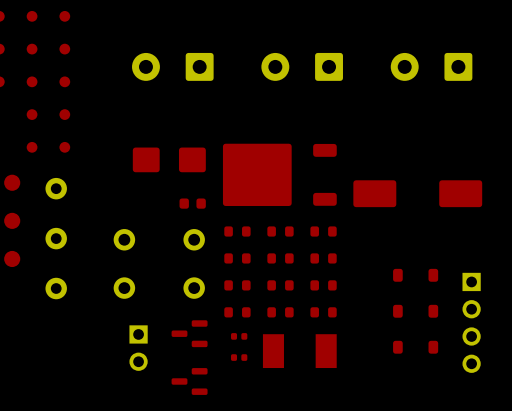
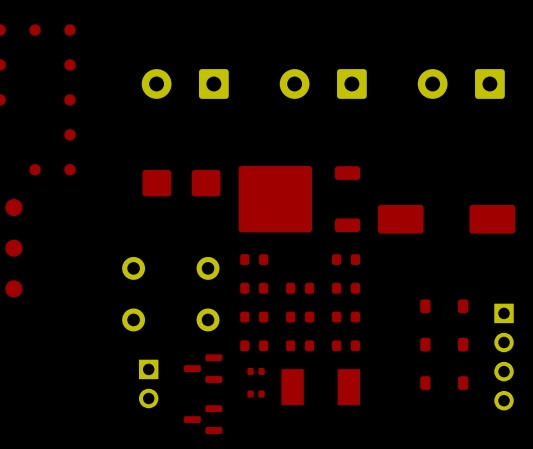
part: (32, 49) -> none
part: (32, 81) -> none
part: (32, 114) -> none
part: (56, 188) -> none
part: (192, 203) -> none
part: (280, 231) -> none
part: (56, 238) -> none
part: (56, 288) -> none

